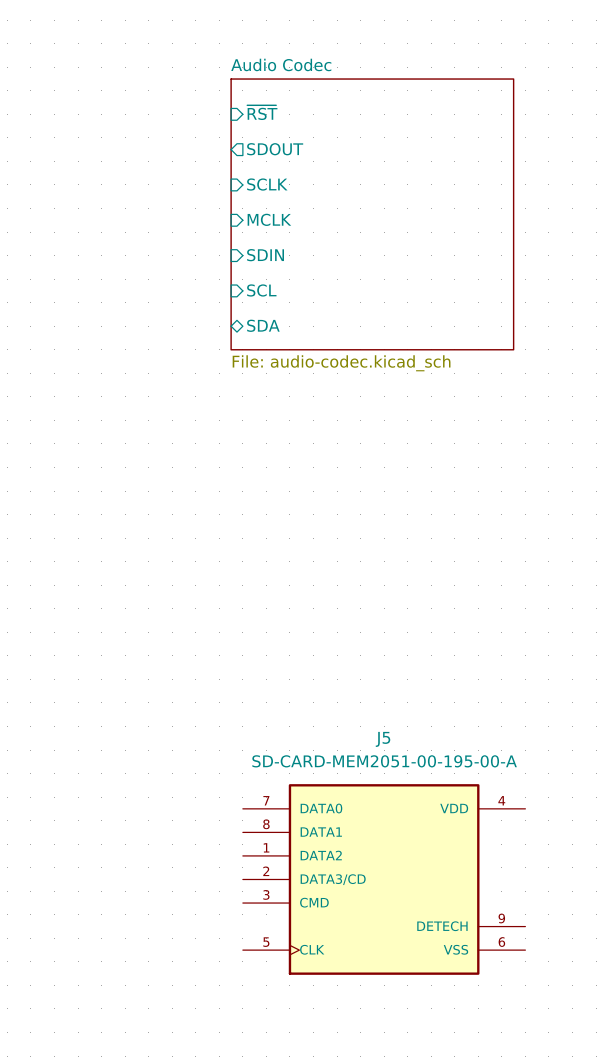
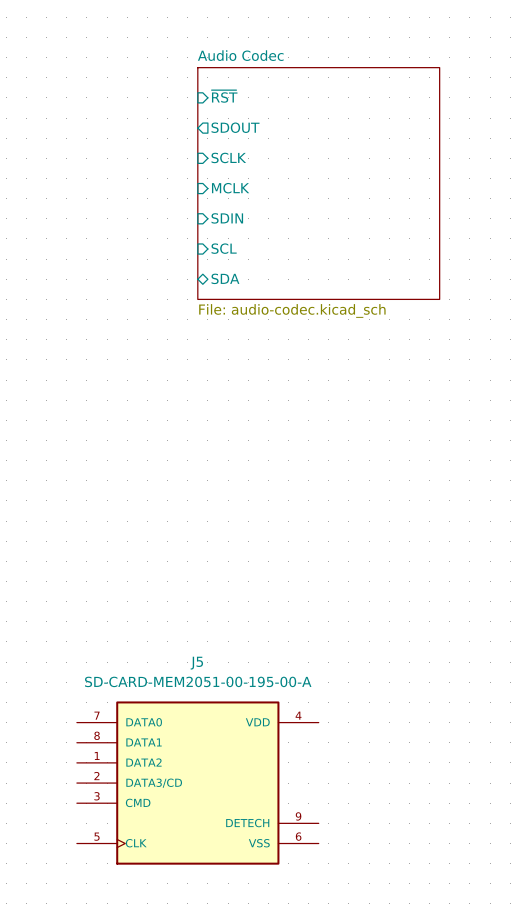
J5 position: (384, 879) -> (197, 783)

